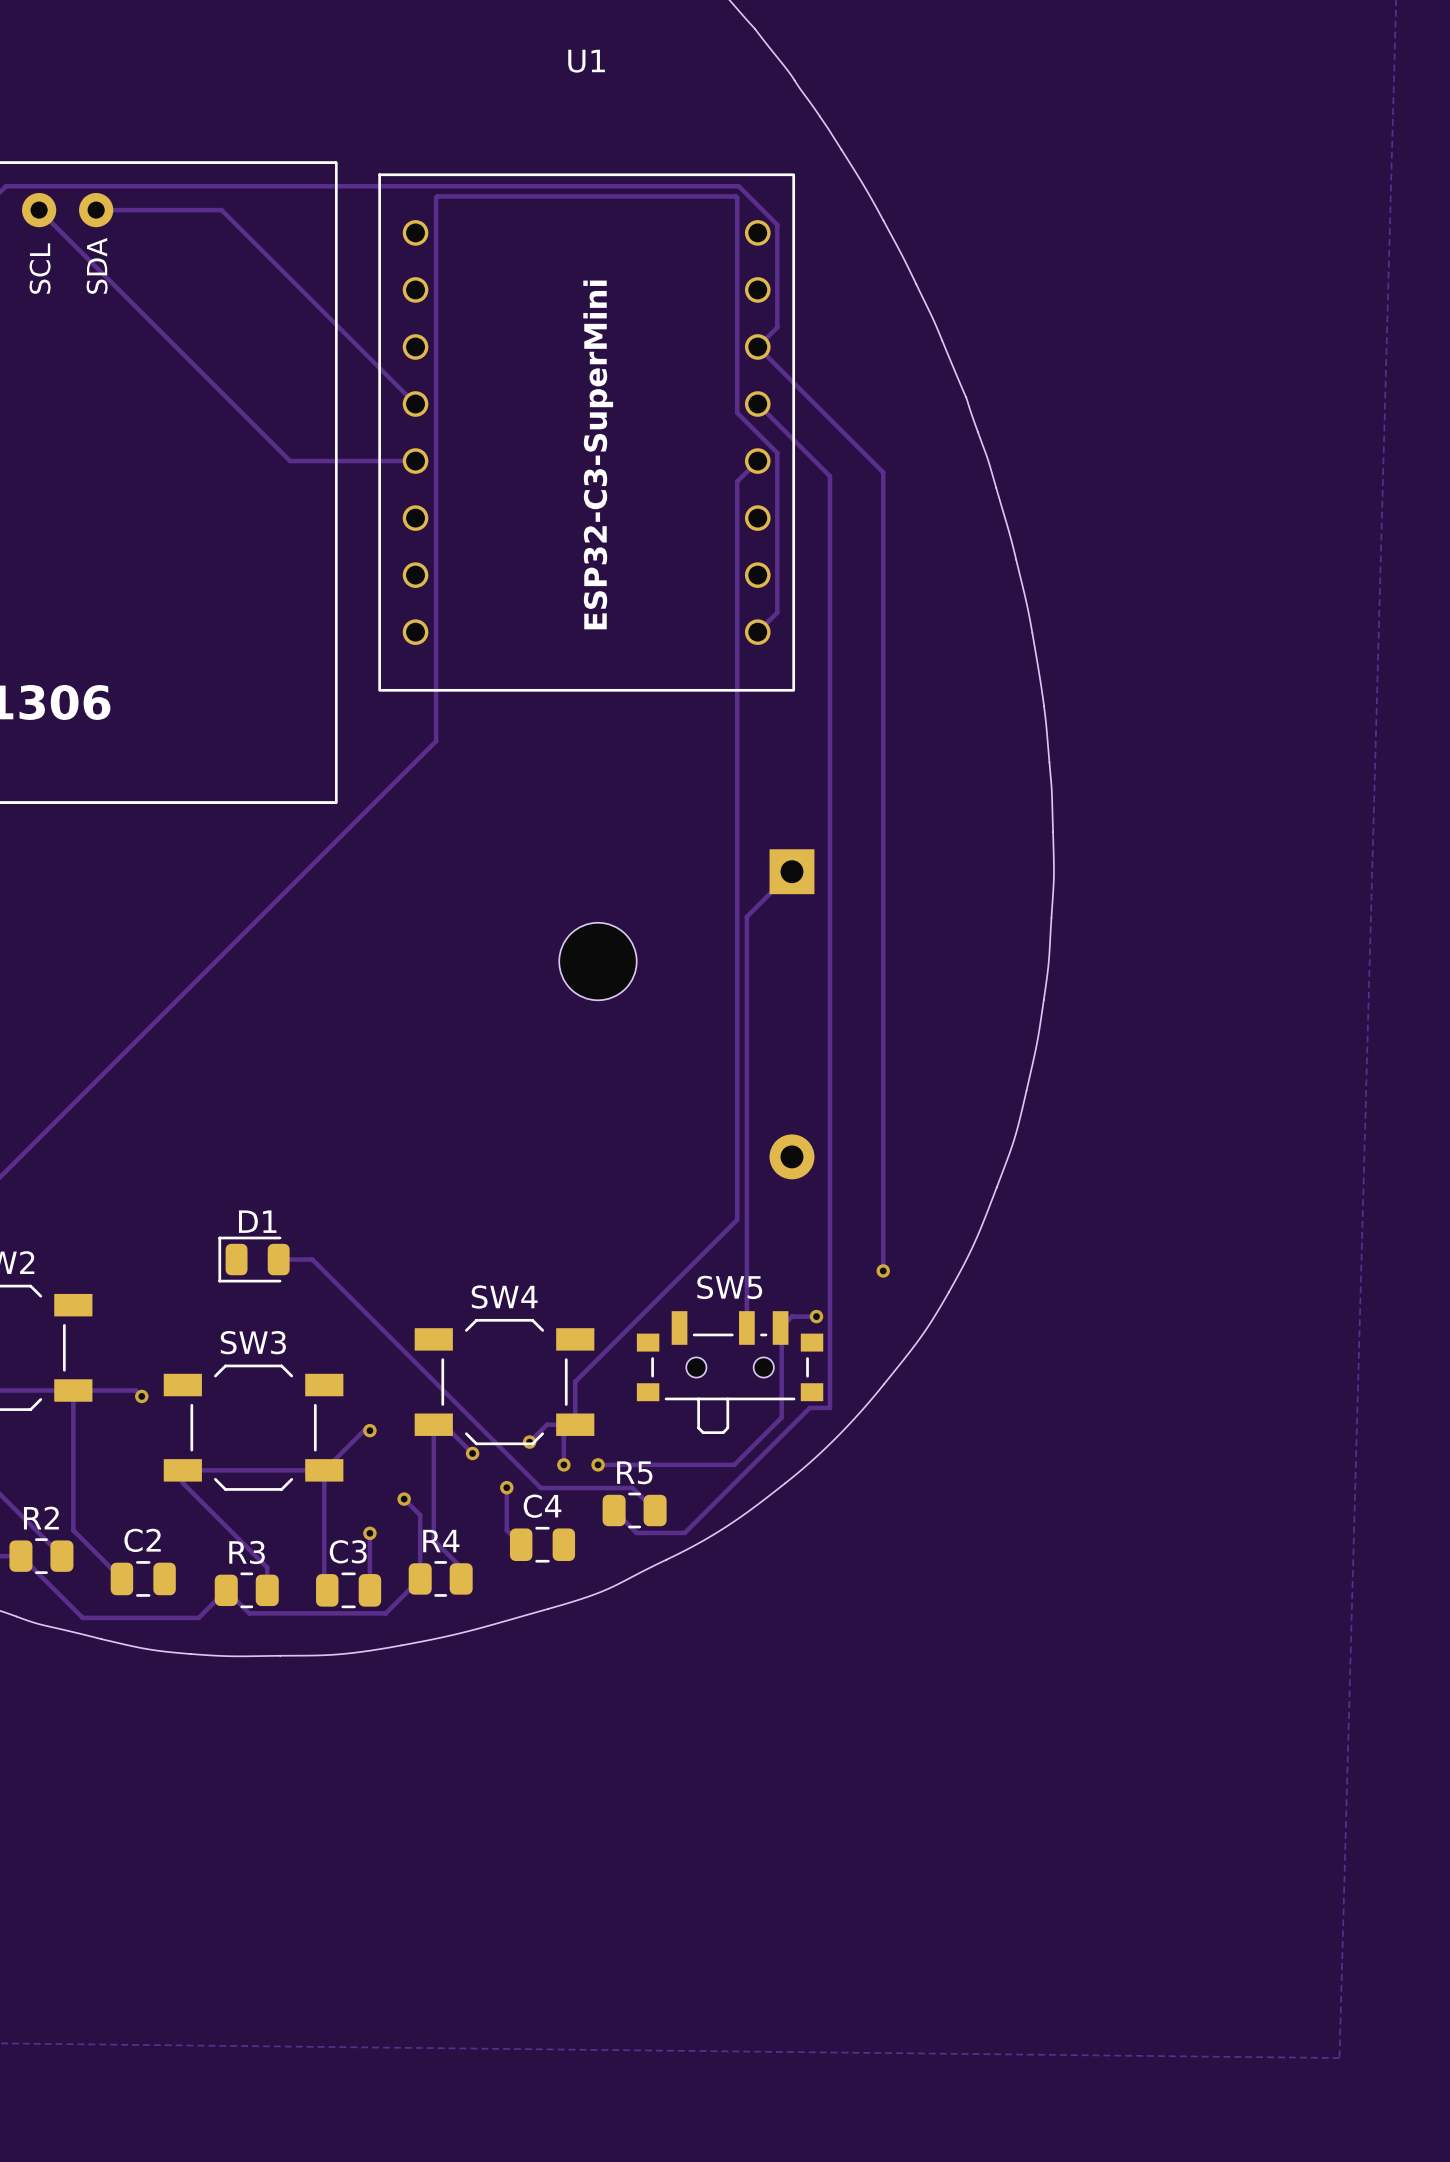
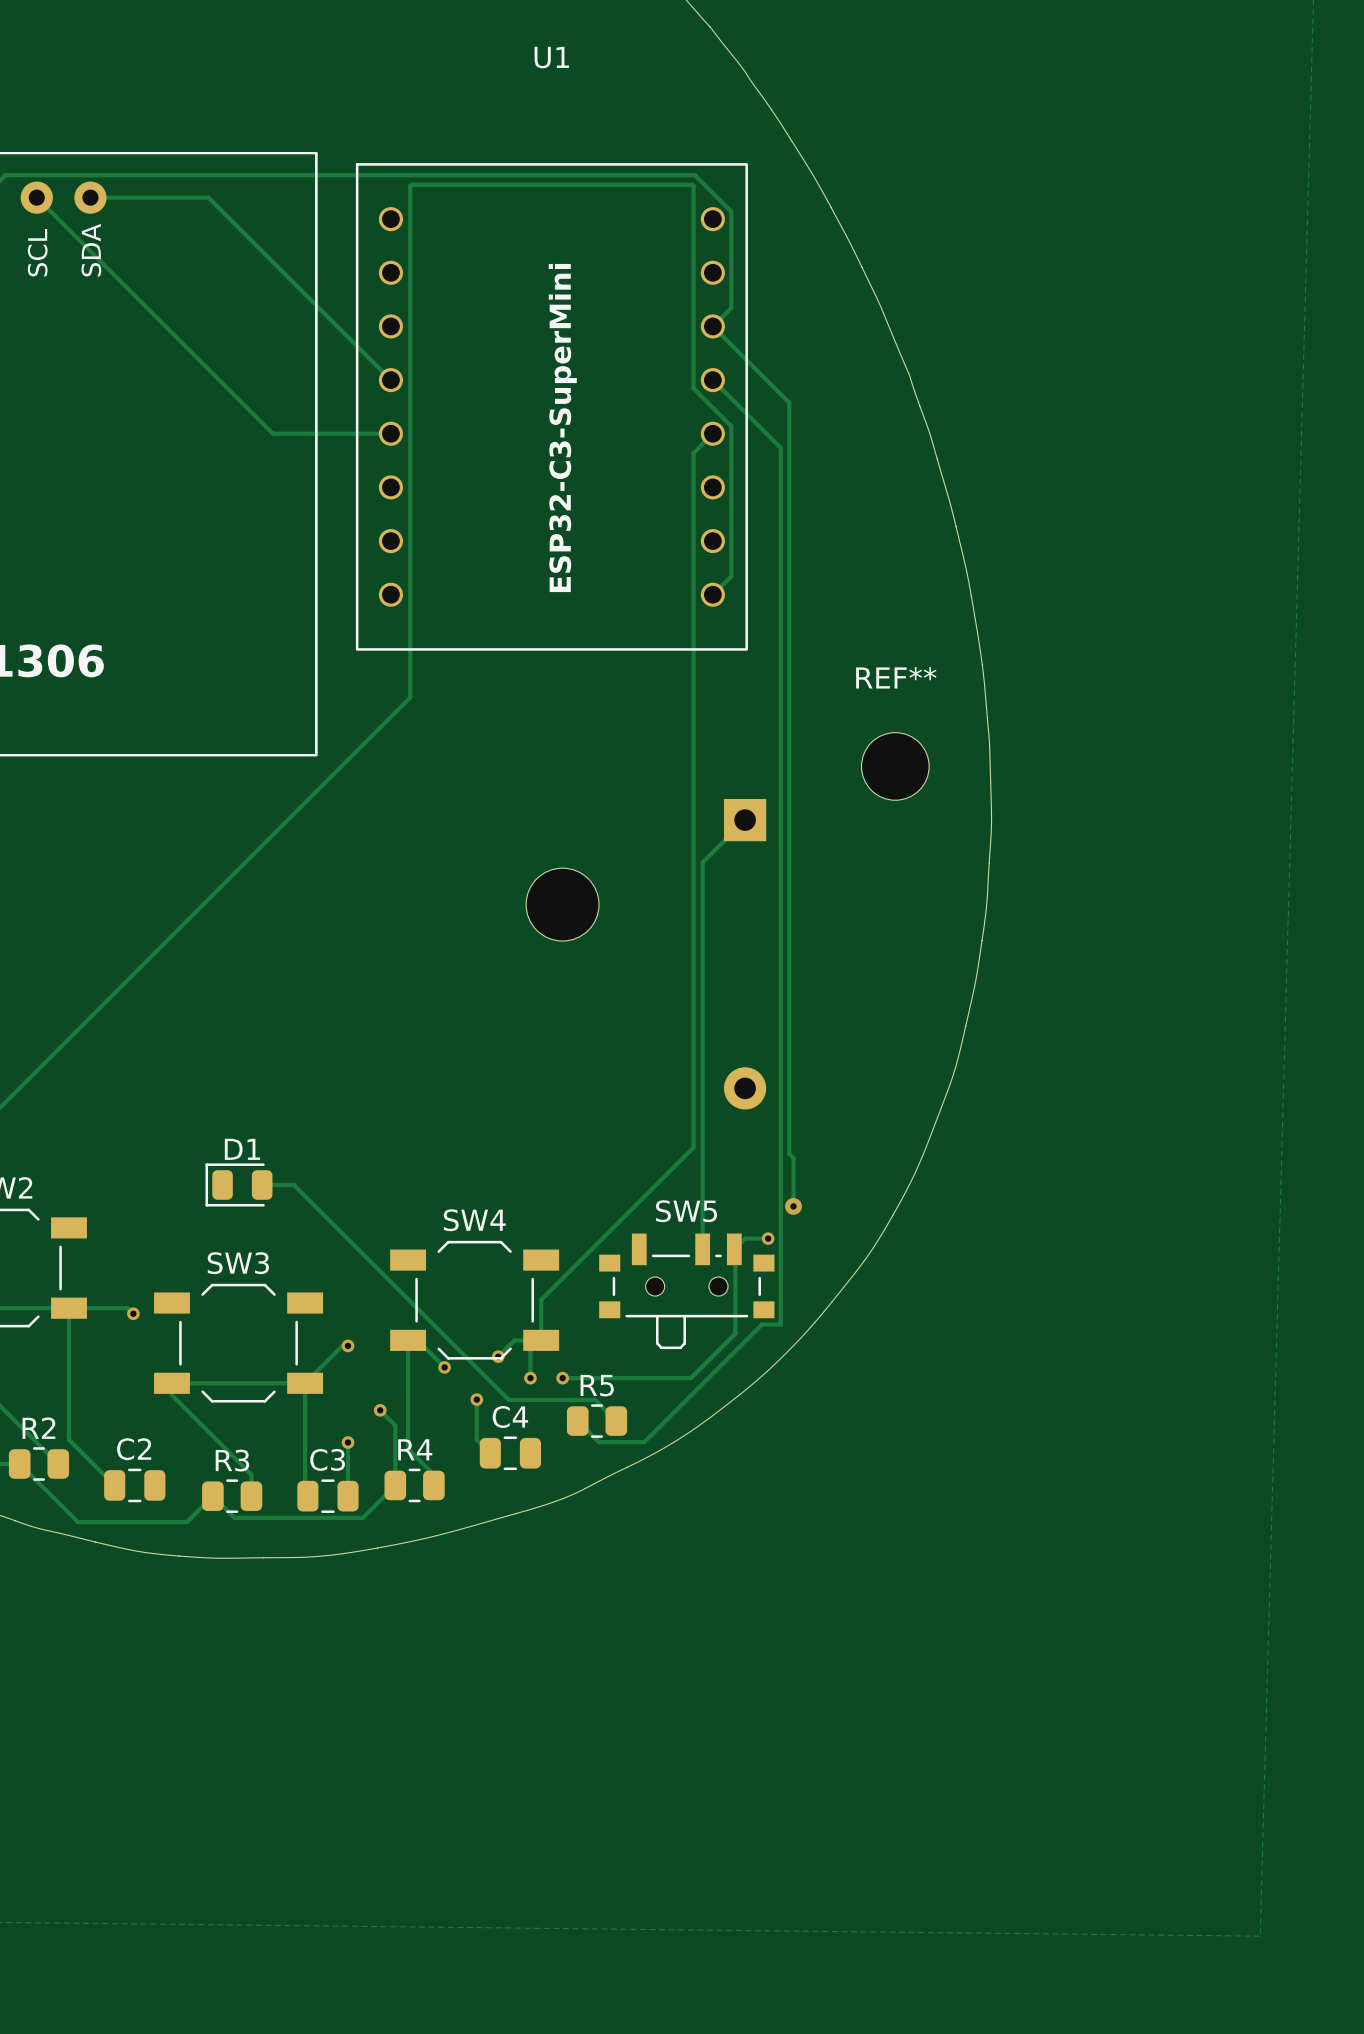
track: (838, 428) (883, 472) (883, 1270) -> (789, 402) (789, 1154) (793, 1158) (793, 1206)
REF**: none -> (895, 766)
via: (883, 1270) -> none
via: none -> (793, 1206)

